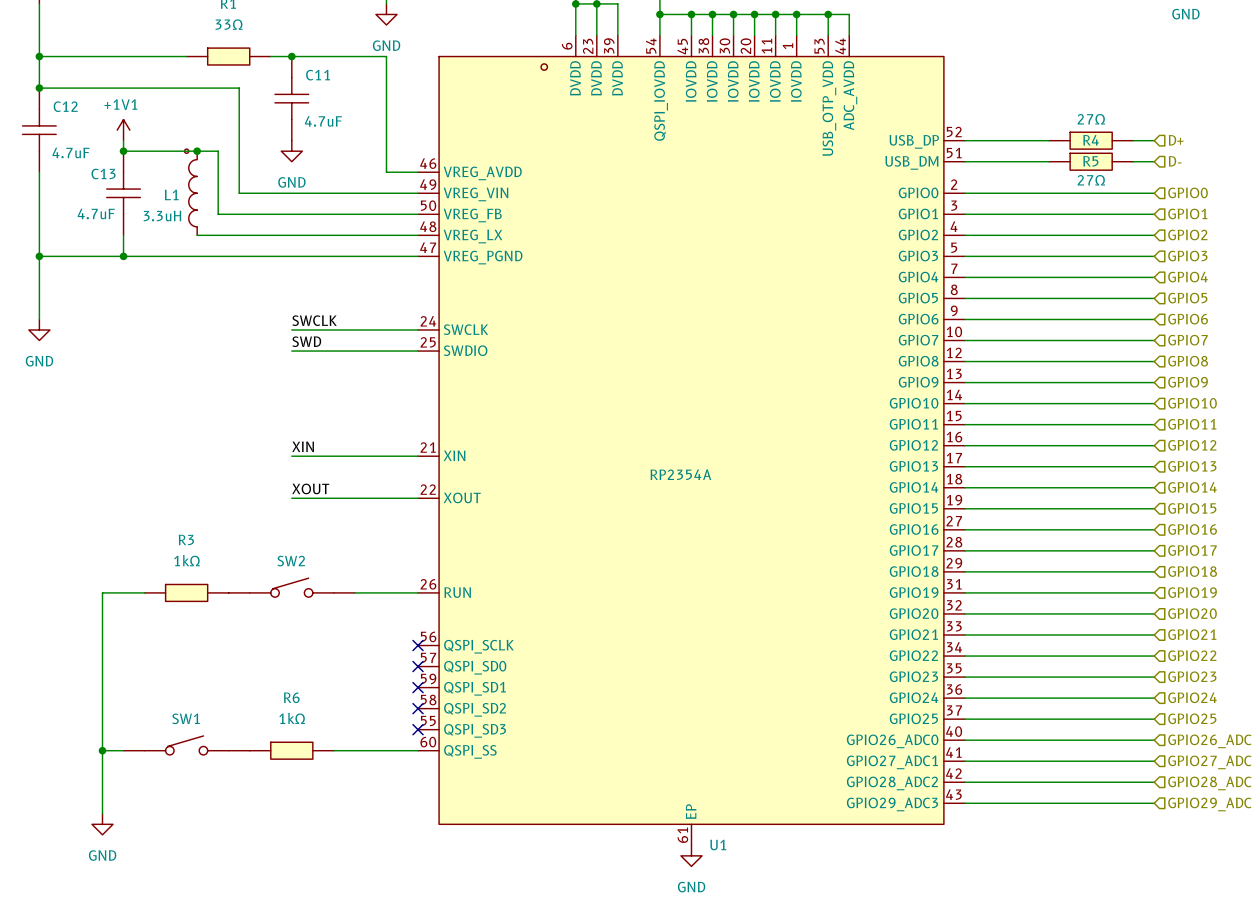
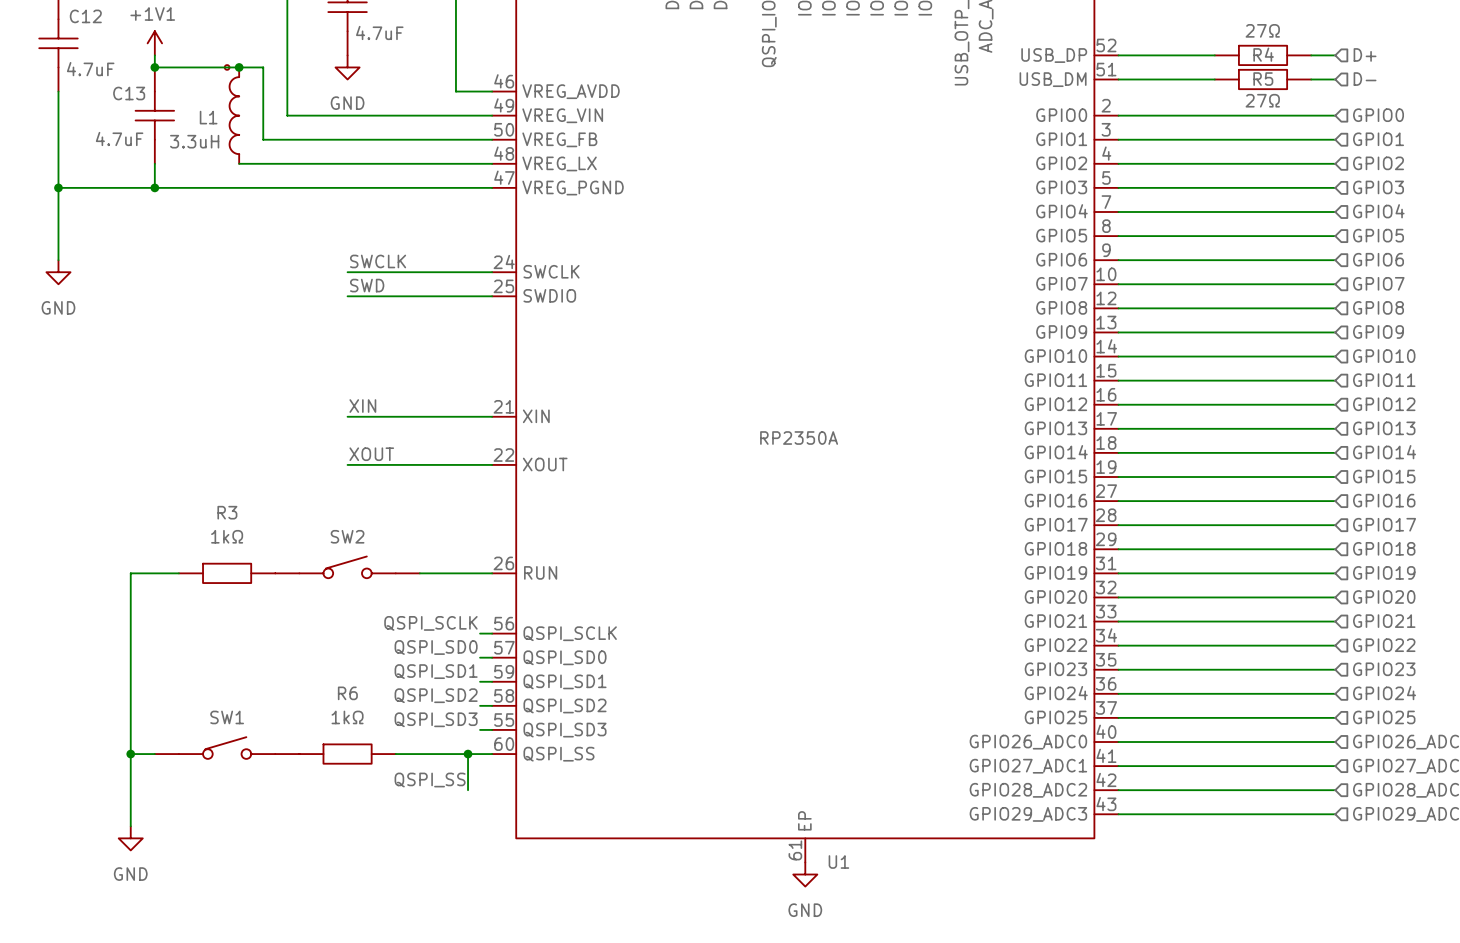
U1 value: RP2354A (680, 474) -> RP2350A (799, 438)
label: none -> QSPI_SCLK (430, 623)
wire: none -> (480, 633) (492, 633)
no-connect mark: (418, 645) -> none
label: none -> QSPI_SD0 (436, 647)
wire: none -> (480, 657) (492, 657)
no-connect mark: (418, 666) -> none
label: none -> QSPI_SD1 (436, 671)
wire: none -> (480, 681) (492, 681)
no-connect mark: (418, 687) -> none
label: none -> QSPI_SD2 (436, 695)
wire: none -> (480, 705) (492, 705)
no-connect mark: (418, 708) -> none
label: none -> QSPI_SD3 (436, 719)
wire: none -> (480, 729) (492, 729)
no-connect mark: (418, 729) -> none
wire: none -> (468, 754) (468, 790)
junction: none -> (468, 754)
label: none -> QSPI_SS (430, 780)

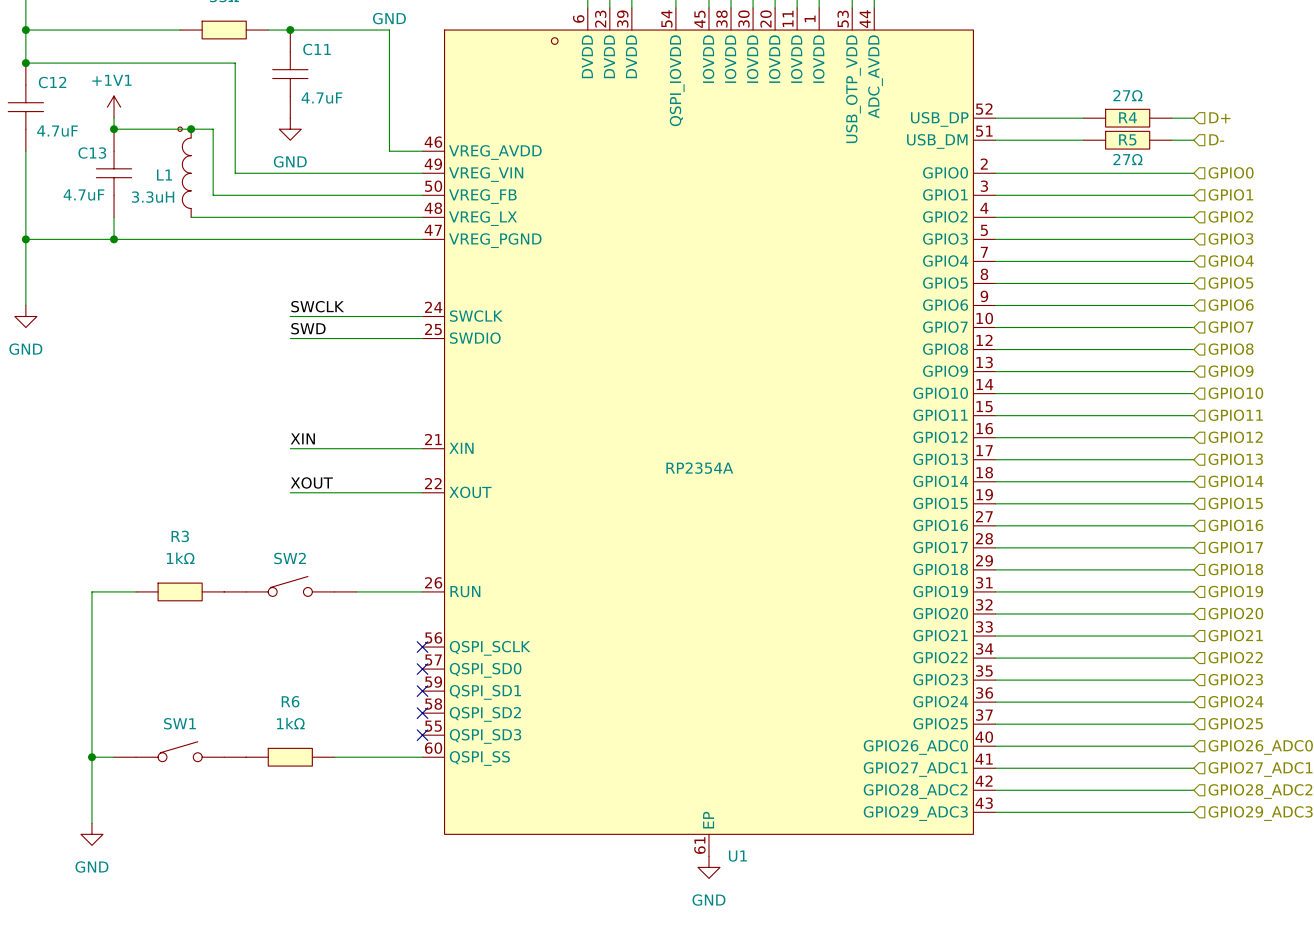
U1 value: RP2350A (799, 438) -> RP2354A (699, 468)
label: QSPI_SCLK (430, 623) -> none
wire: (480, 633) (492, 633) -> none
no-connect mark: none -> (422, 647)
label: QSPI_SD0 (436, 647) -> none
wire: (480, 657) (492, 657) -> none
no-connect mark: none -> (422, 669)
label: QSPI_SD1 (436, 671) -> none
wire: (480, 681) (492, 681) -> none
no-connect mark: none -> (422, 691)
label: QSPI_SD2 (436, 695) -> none
wire: (480, 705) (492, 705) -> none
no-connect mark: none -> (422, 713)
label: QSPI_SD3 (436, 719) -> none
wire: (480, 729) (492, 729) -> none
no-connect mark: none -> (422, 735)
wire: (468, 754) (468, 790) -> none
junction: (468, 754) -> none
label: QSPI_SS (430, 780) -> none

